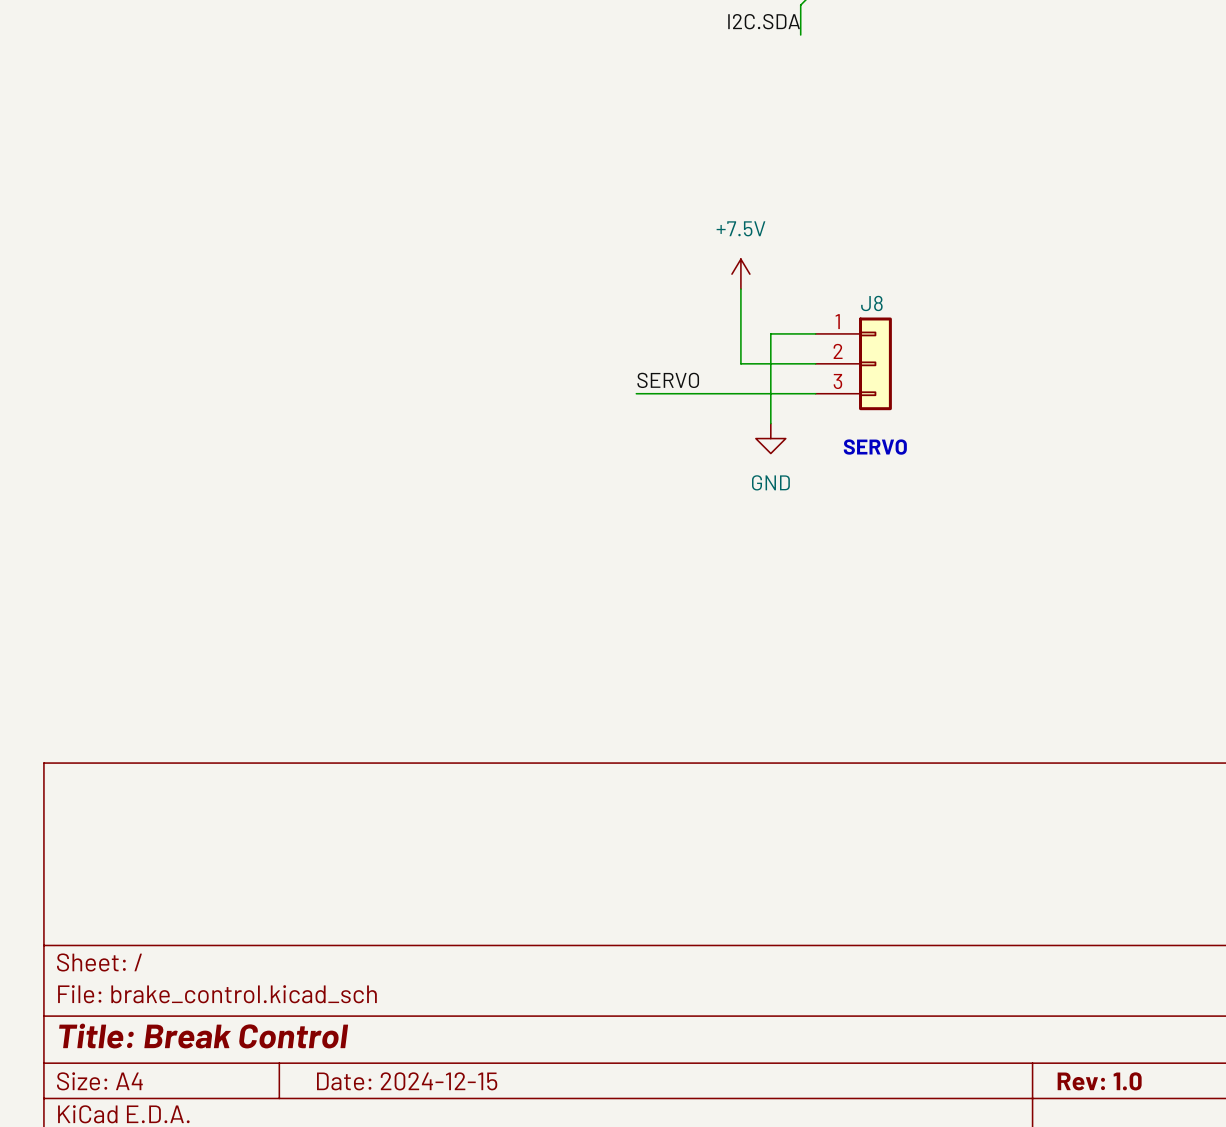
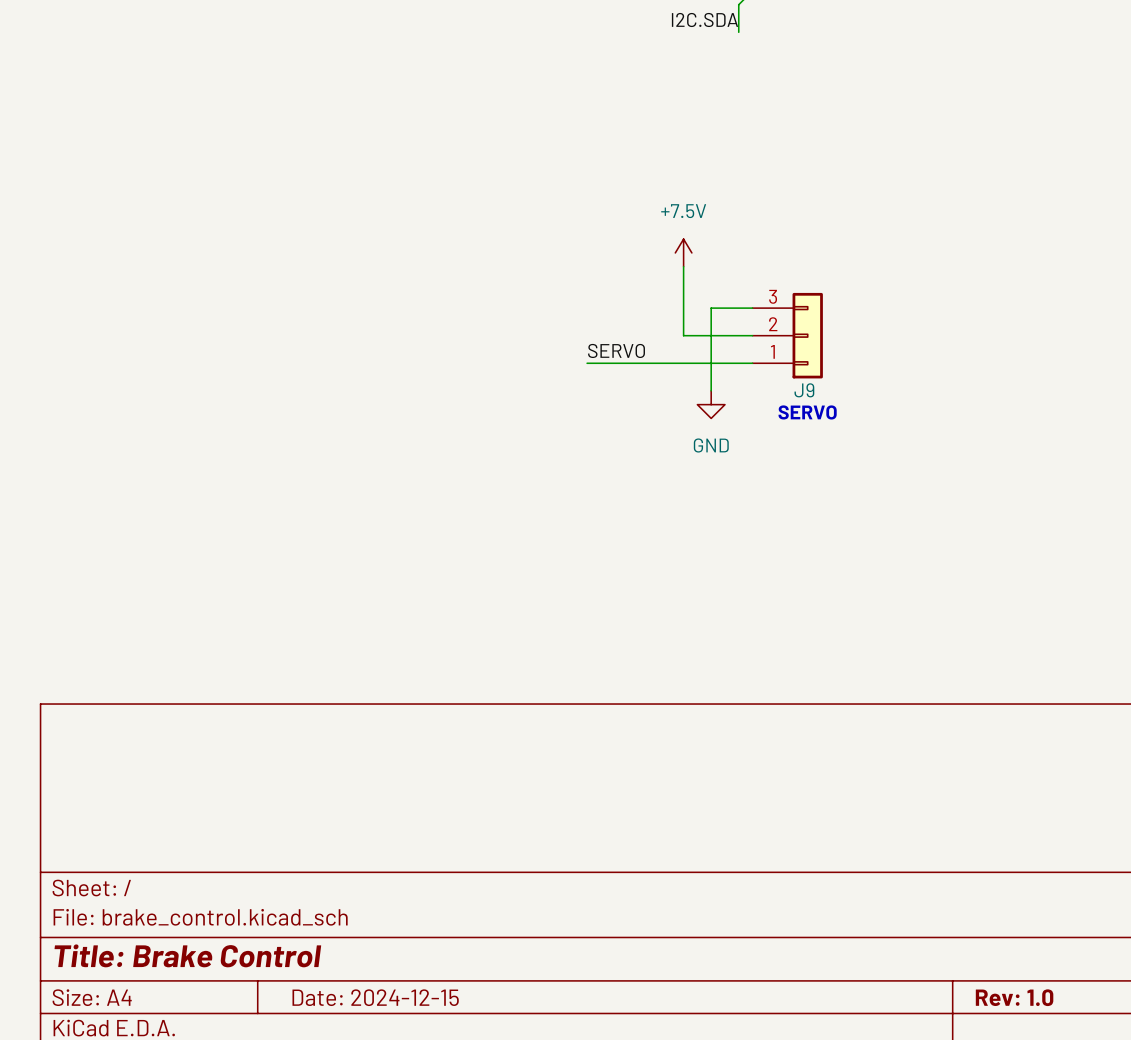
J8 name: J8 (871, 303) -> J9 (804, 390)
J8 flip: as is (875, 363) -> up-down (807, 335)
title block: Title: Break Control (203, 1036) -> Title: Brake Control (187, 955)

